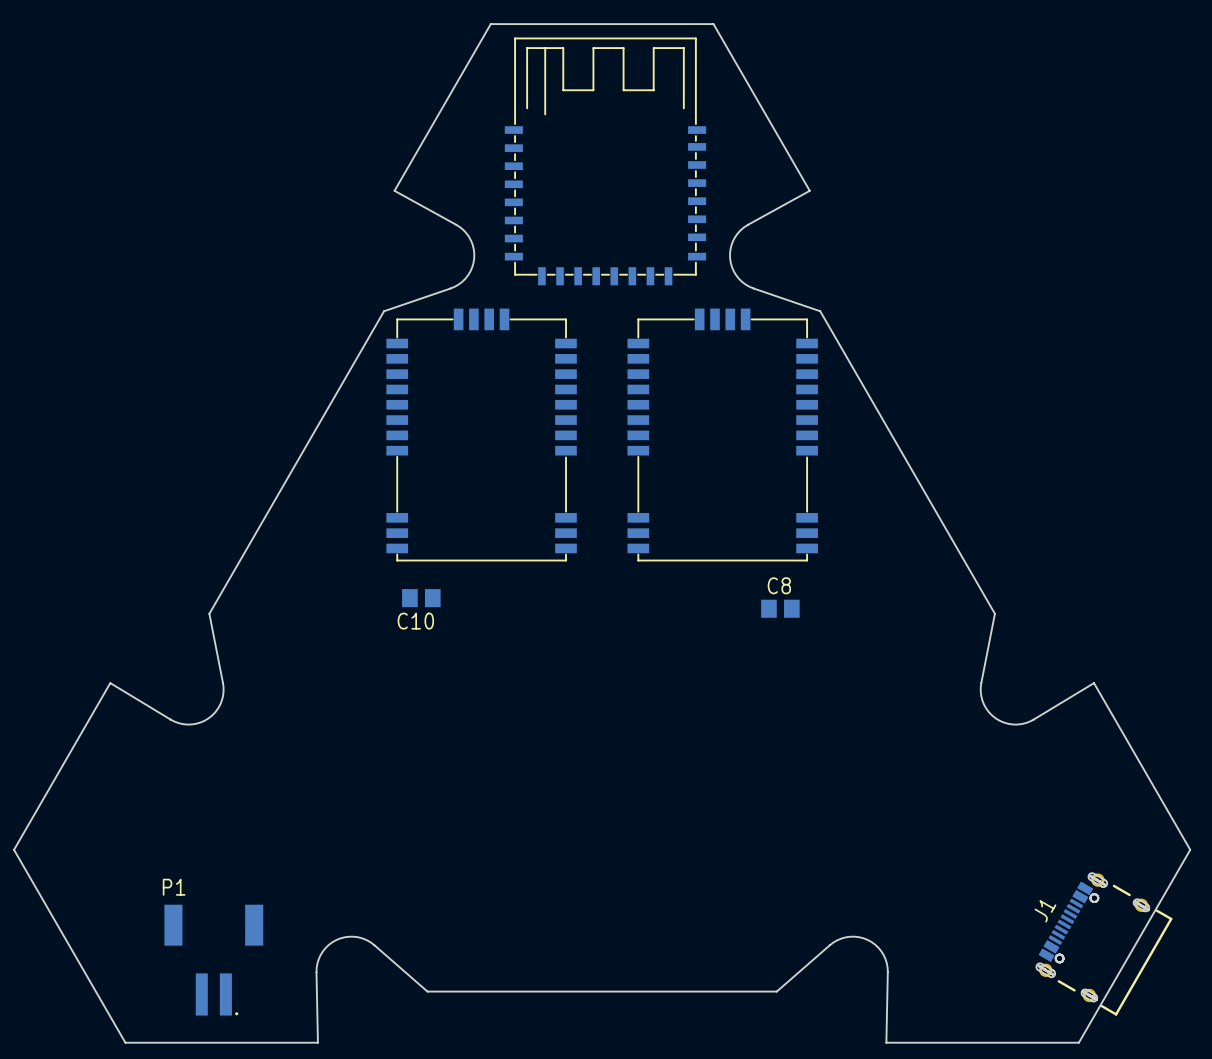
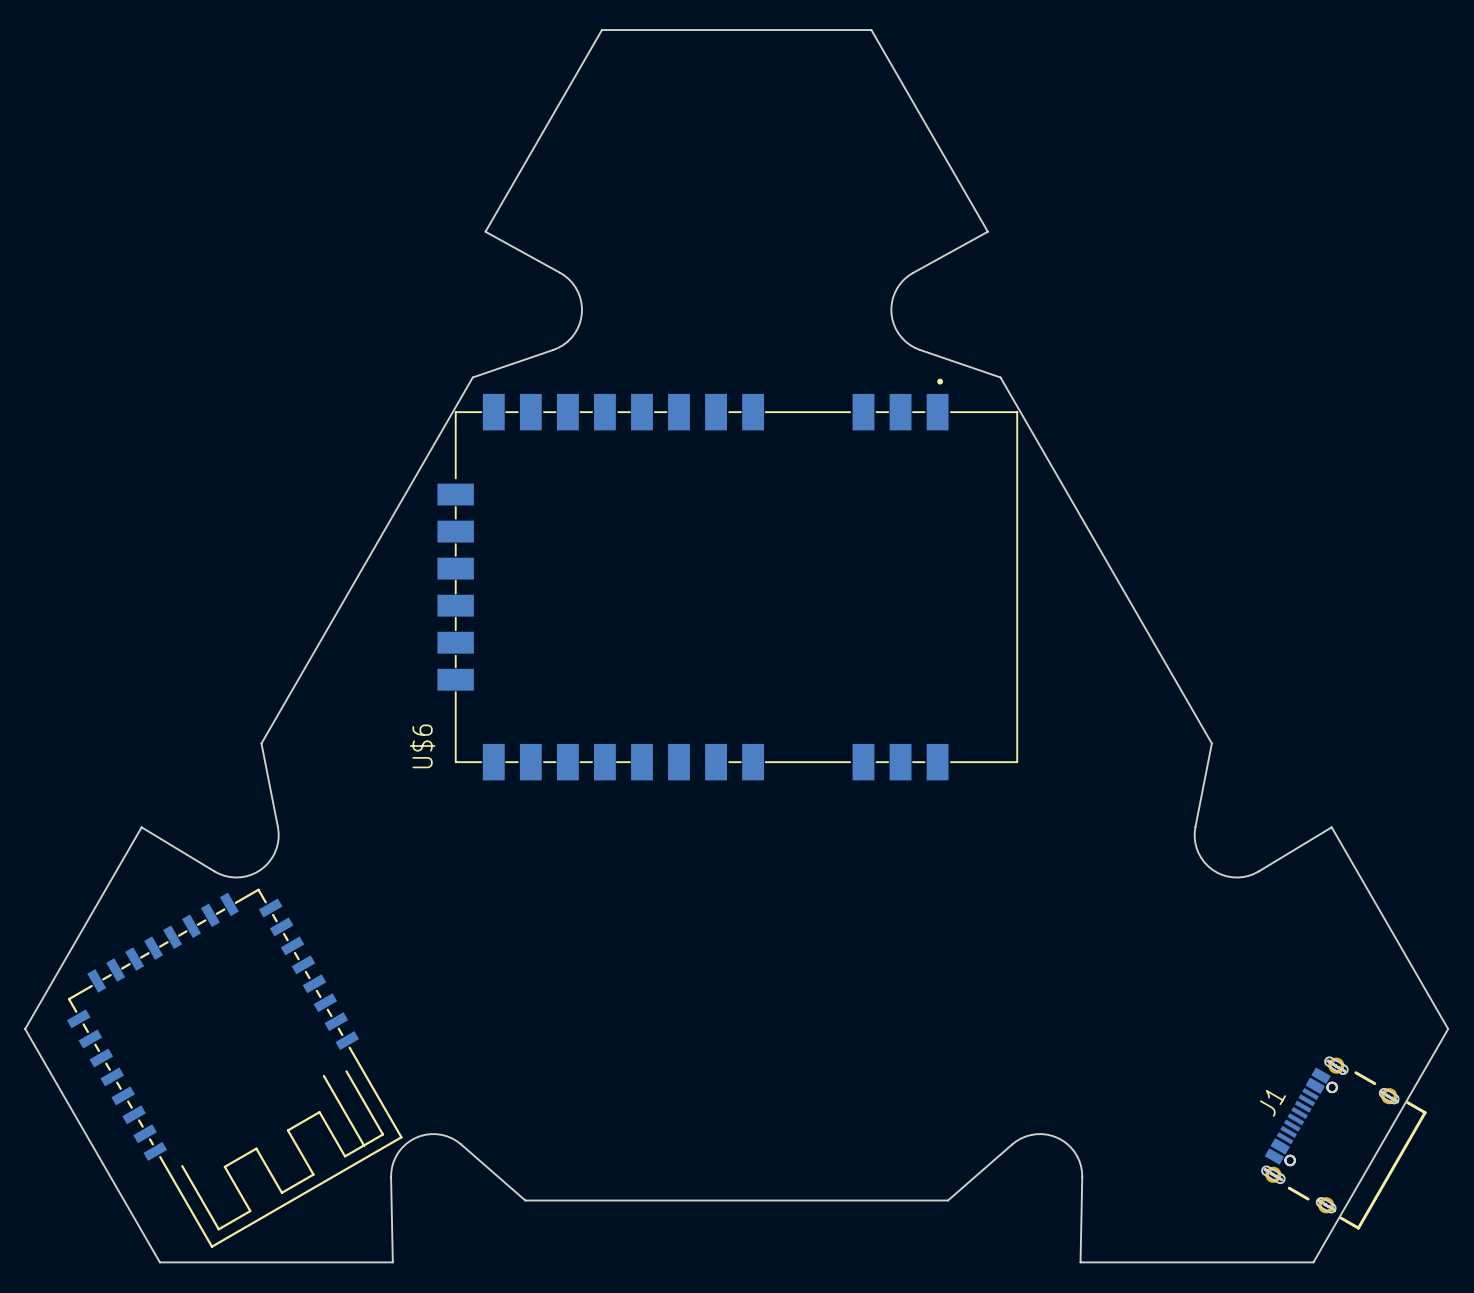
part: (605, 161) -> none
part: (481, 435) -> none
part: (722, 435) -> none
U$6: none -> (727, 579)
C10: (421, 598) -> none
C8: (780, 608) -> none
part: none -> (234, 1068)
P1: (213, 960) -> none

